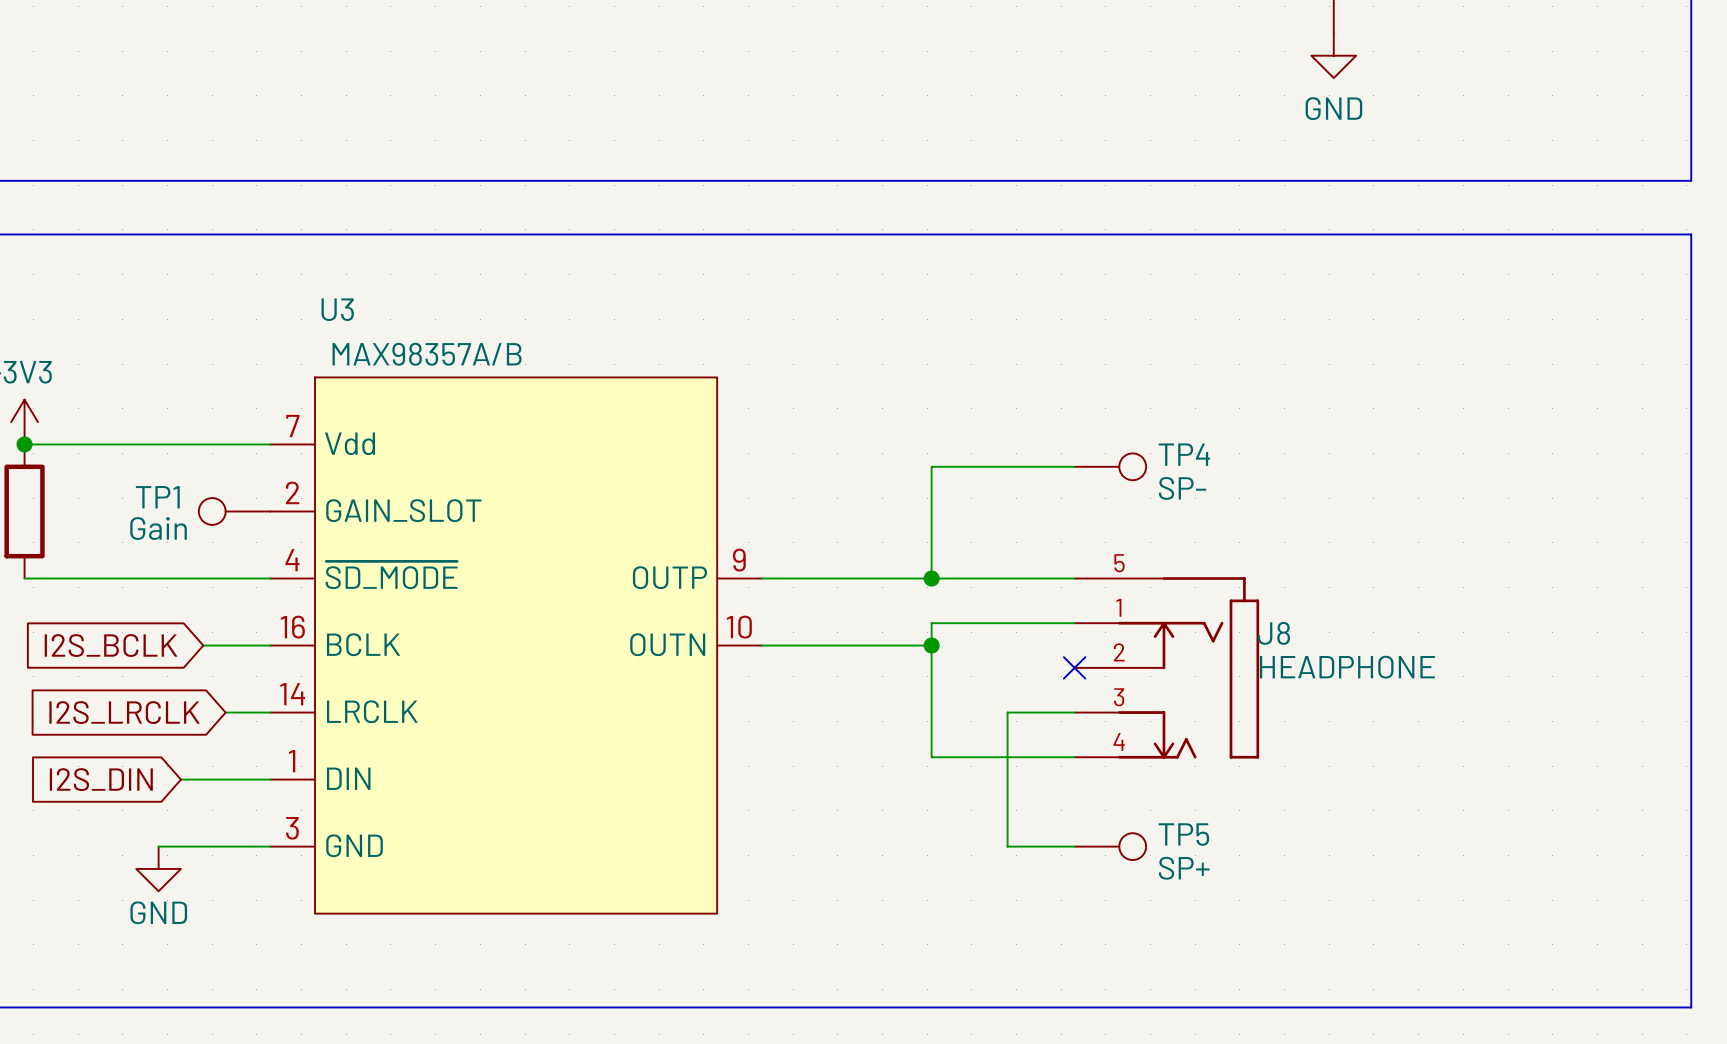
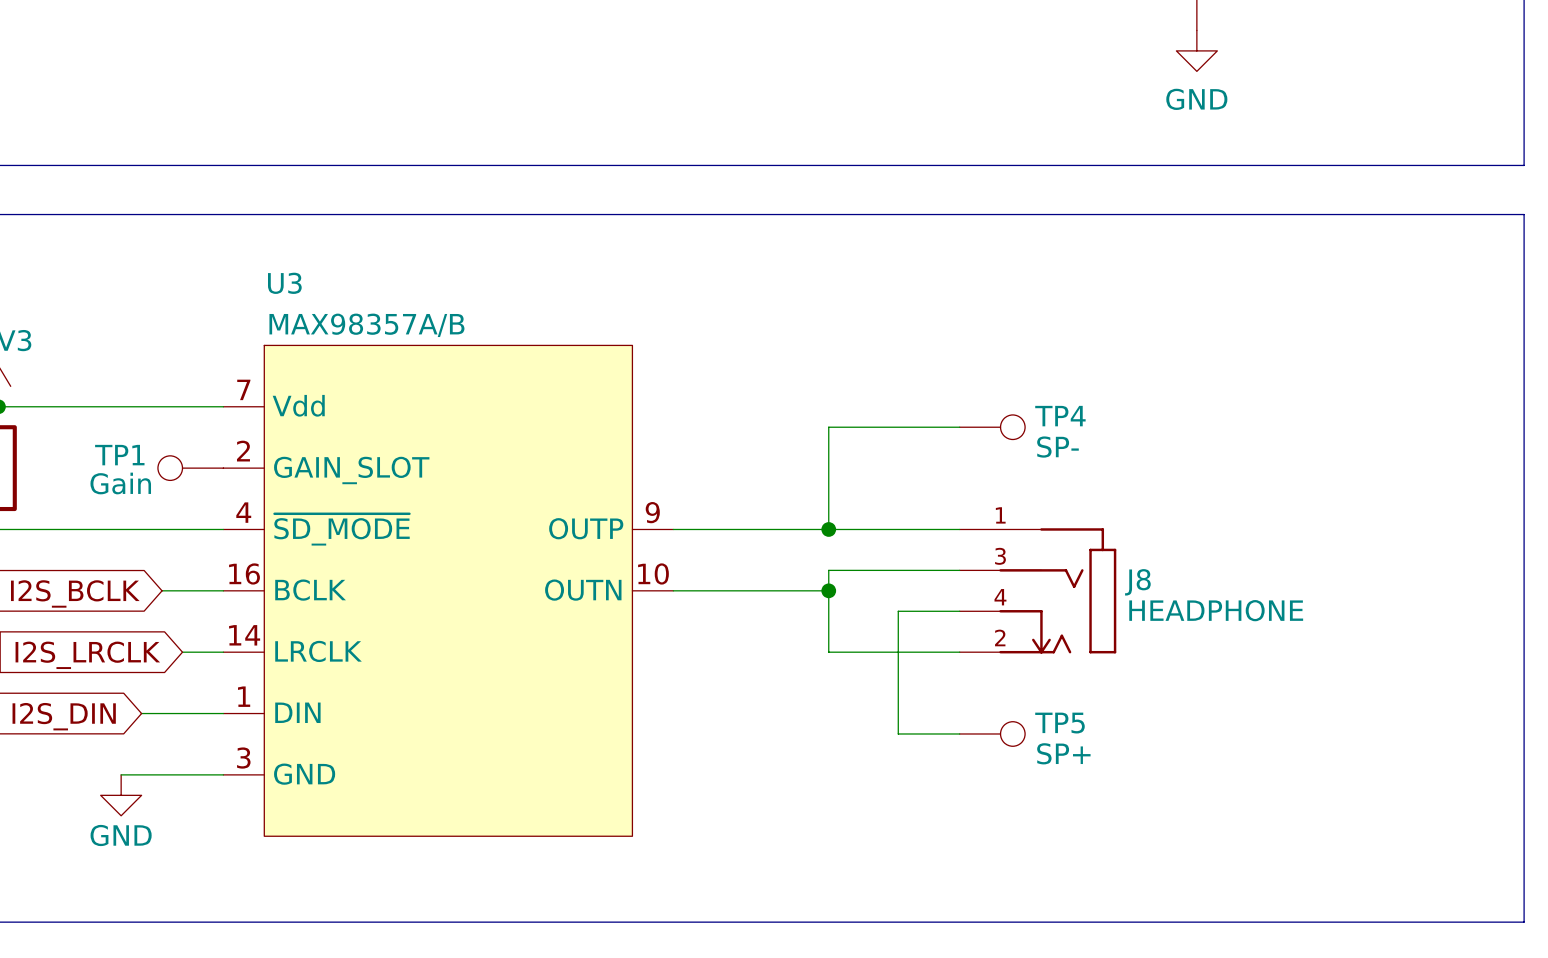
J8 symbol: [1074, 577, 1260, 759] -> [959, 528, 1117, 654]
no-connect mark: (1074, 667) -> none
wire: (931, 712) (931, 757) (1074, 757) -> (828, 652) (898, 652) (898, 611) (959, 611)
wire: (1007, 801) (1007, 846) (1074, 846) -> (898, 733) (959, 733)
TP5 position: (1110, 846) -> (992, 733)

